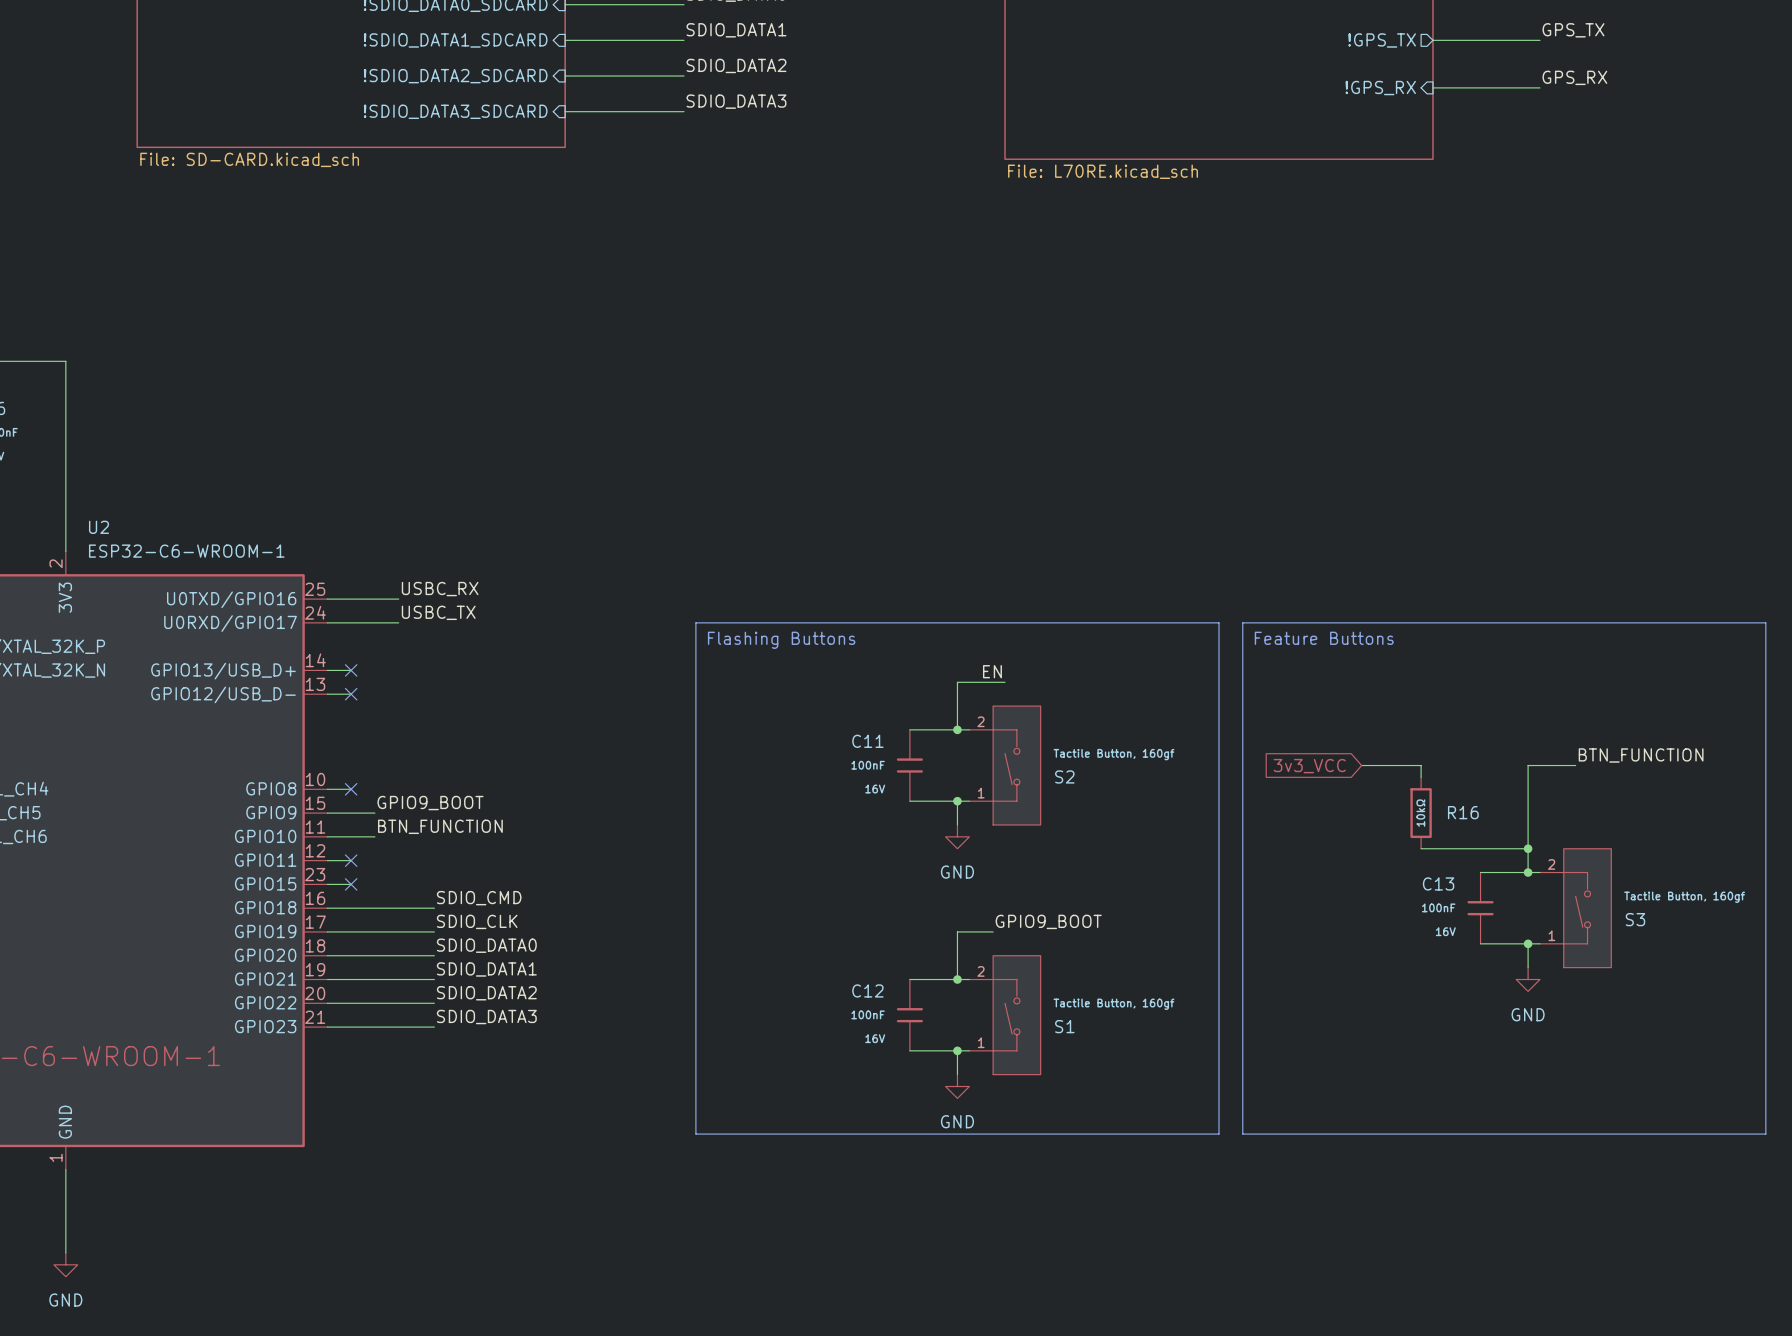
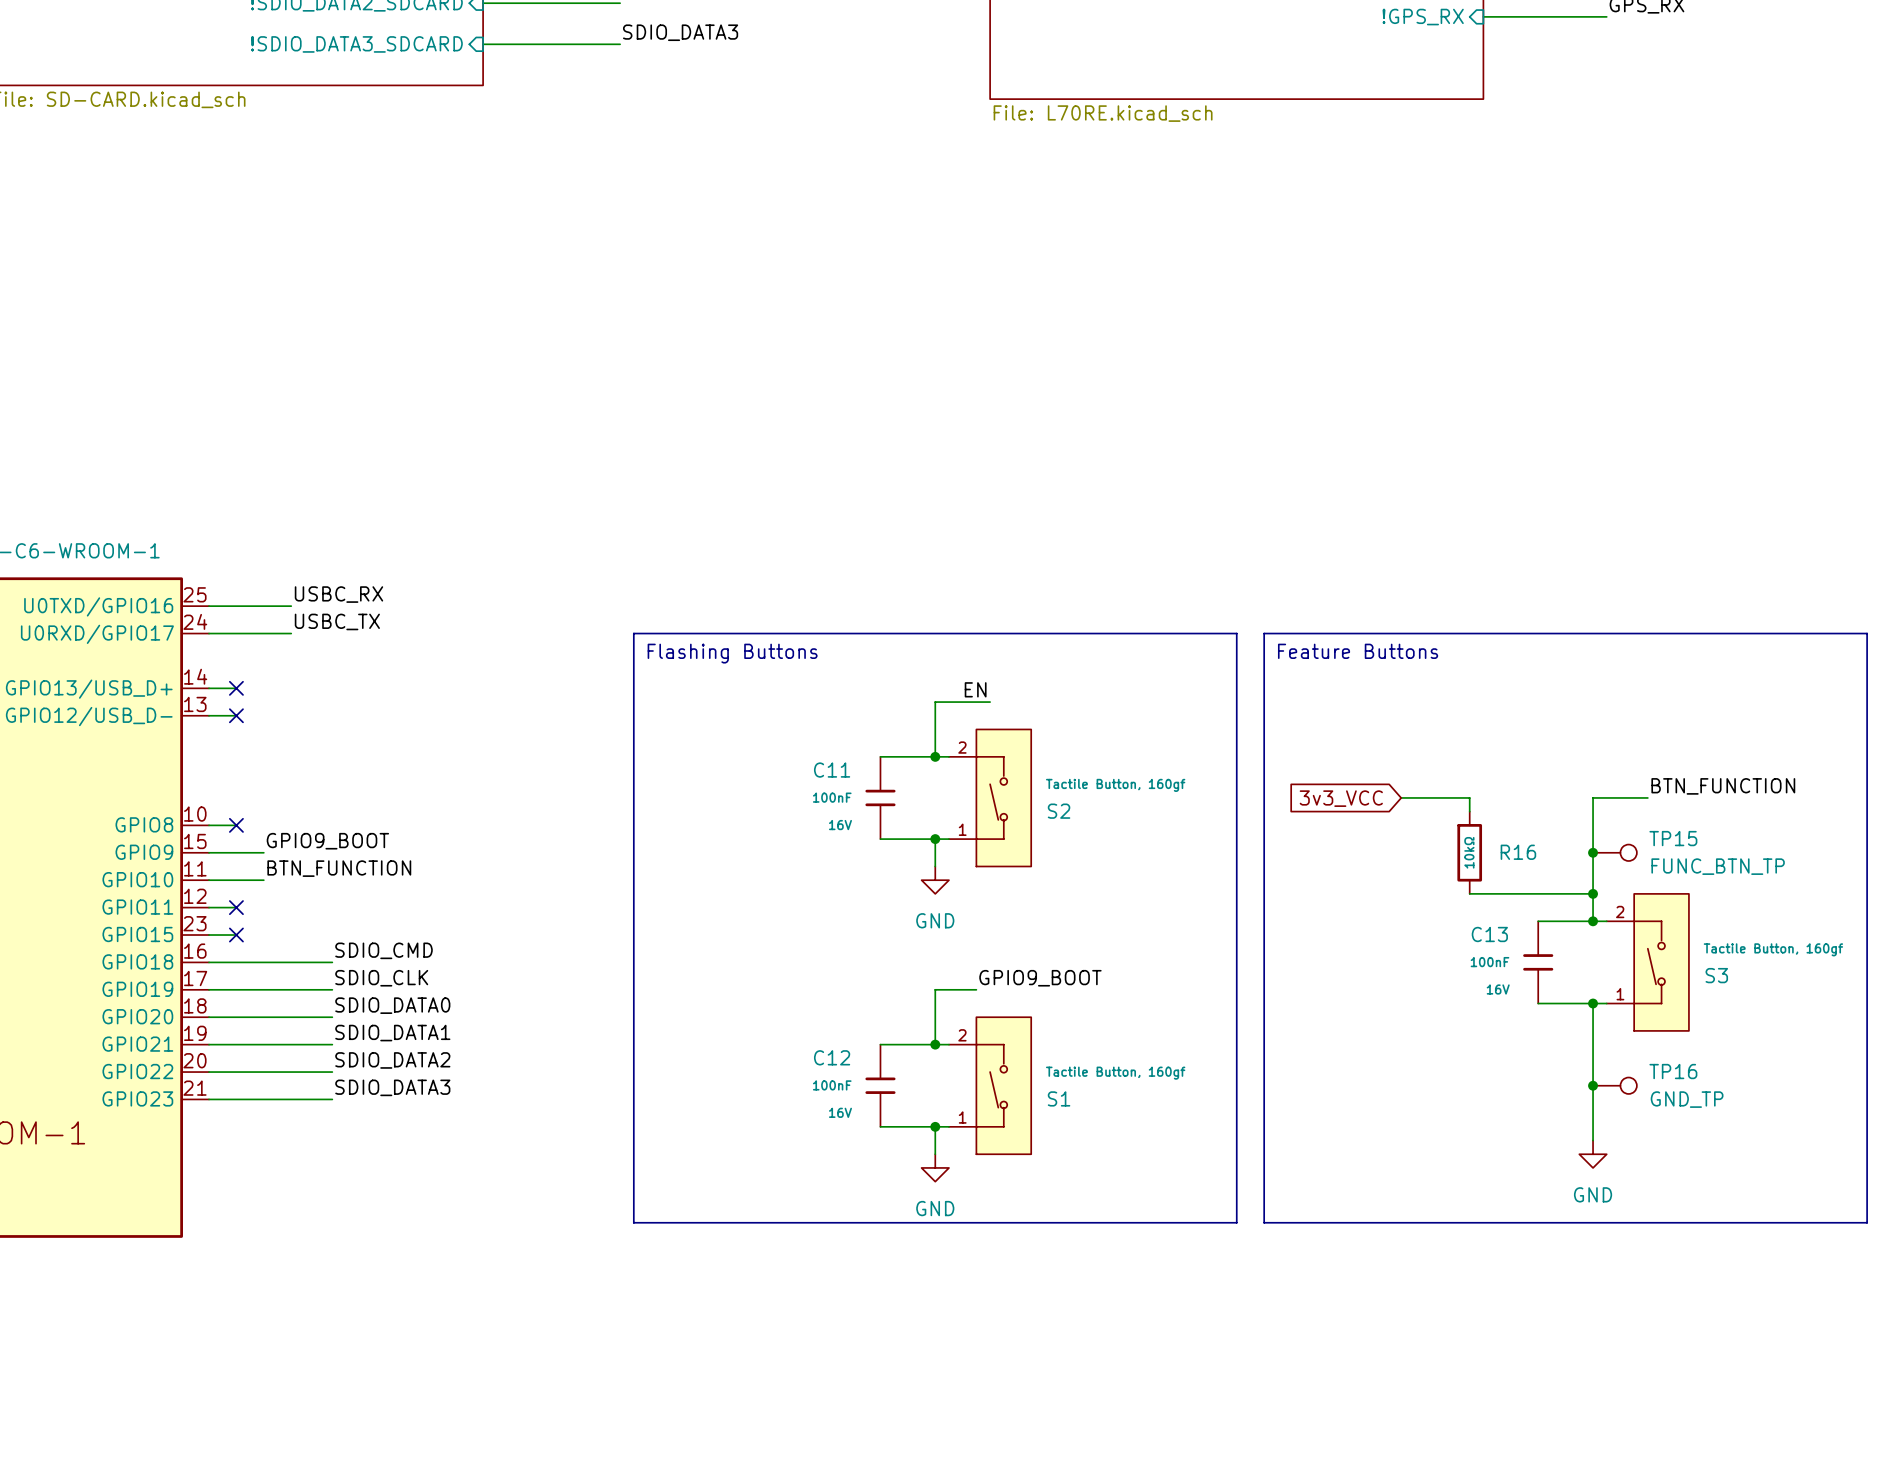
junction: none -> (1593, 852)
TP15: none -> FUNC_BTN_TP (1614, 852)
wire: none -> (1593, 1030) (1593, 1140)
power symbol position: GND (1528, 979) -> GND (1593, 1154)
junction: none -> (1593, 1085)
TP16: none -> GND_TP (1614, 1085)

